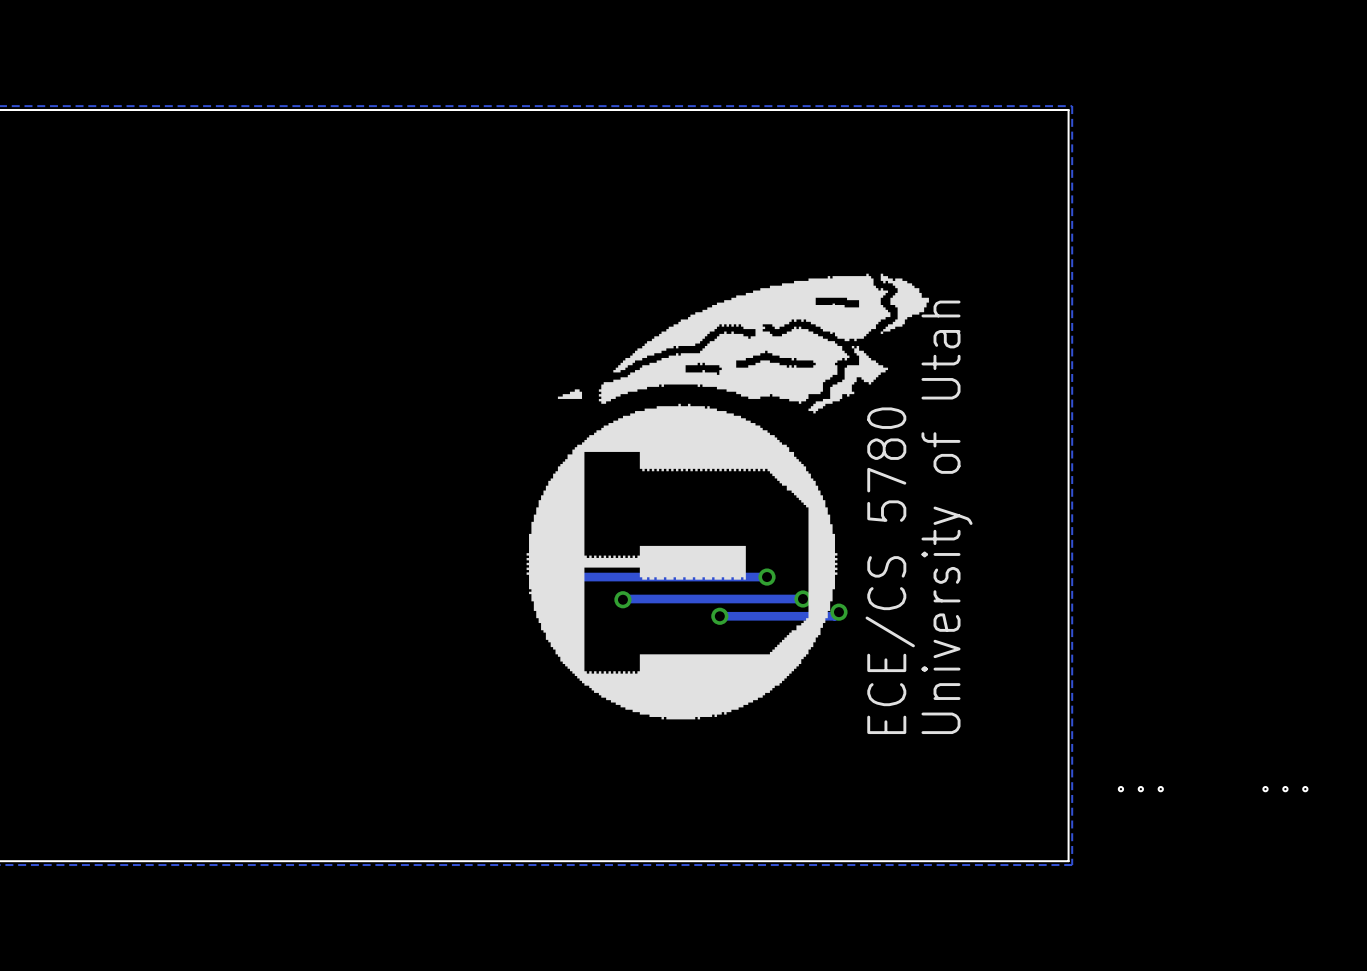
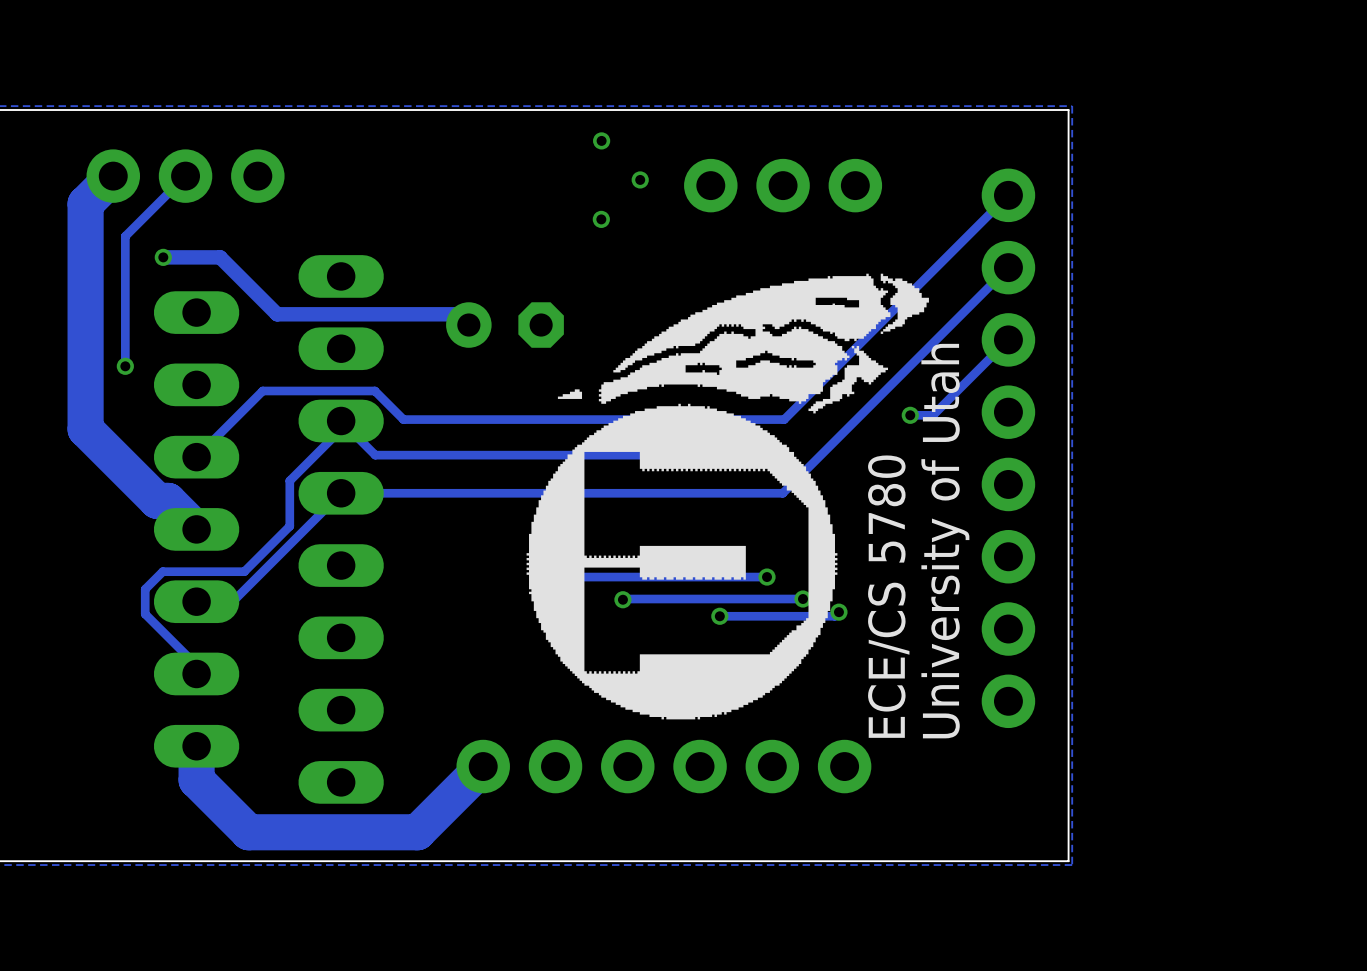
via: none -> (601, 140)
track: none -> (113, 176) (85, 203) (85, 429) (157, 500) (168, 500) (196, 529)
track: none -> (185, 176) (125, 236) (125, 366)
part: none -> (185, 176)
via: none -> (640, 179)
part: none -> (783, 185)
track: none -> (1008, 195) (784, 419) (403, 419) (374, 390) (262, 390) (196, 457)
via: none -> (601, 219)
track: none -> (163, 257) (220, 257) (277, 314) (462, 314) (462, 318) (468, 325)
via: none -> (163, 257)
track: none -> (1008, 267) (782, 493) (341, 493) (232, 601) (196, 601)
part: none -> (504, 325)
track: none -> (1008, 339) (933, 415) (910, 415)
via: none -> (125, 366)
via: none -> (910, 415)
part: none -> (1008, 448)
track: none -> (731, 455) (375, 455) (341, 421) (341, 429) (289, 480) (289, 526) (244, 571) (162, 571) (145, 589) (145, 614) (196, 665) (196, 673)
part: none -> (268, 529)
track: none -> (207, 746) (196, 746) (196, 780) (248, 832) (417, 832) (483, 766)
part: none -> (663, 766)
part: (1140, 789) -> none
part: (1285, 789) -> none

